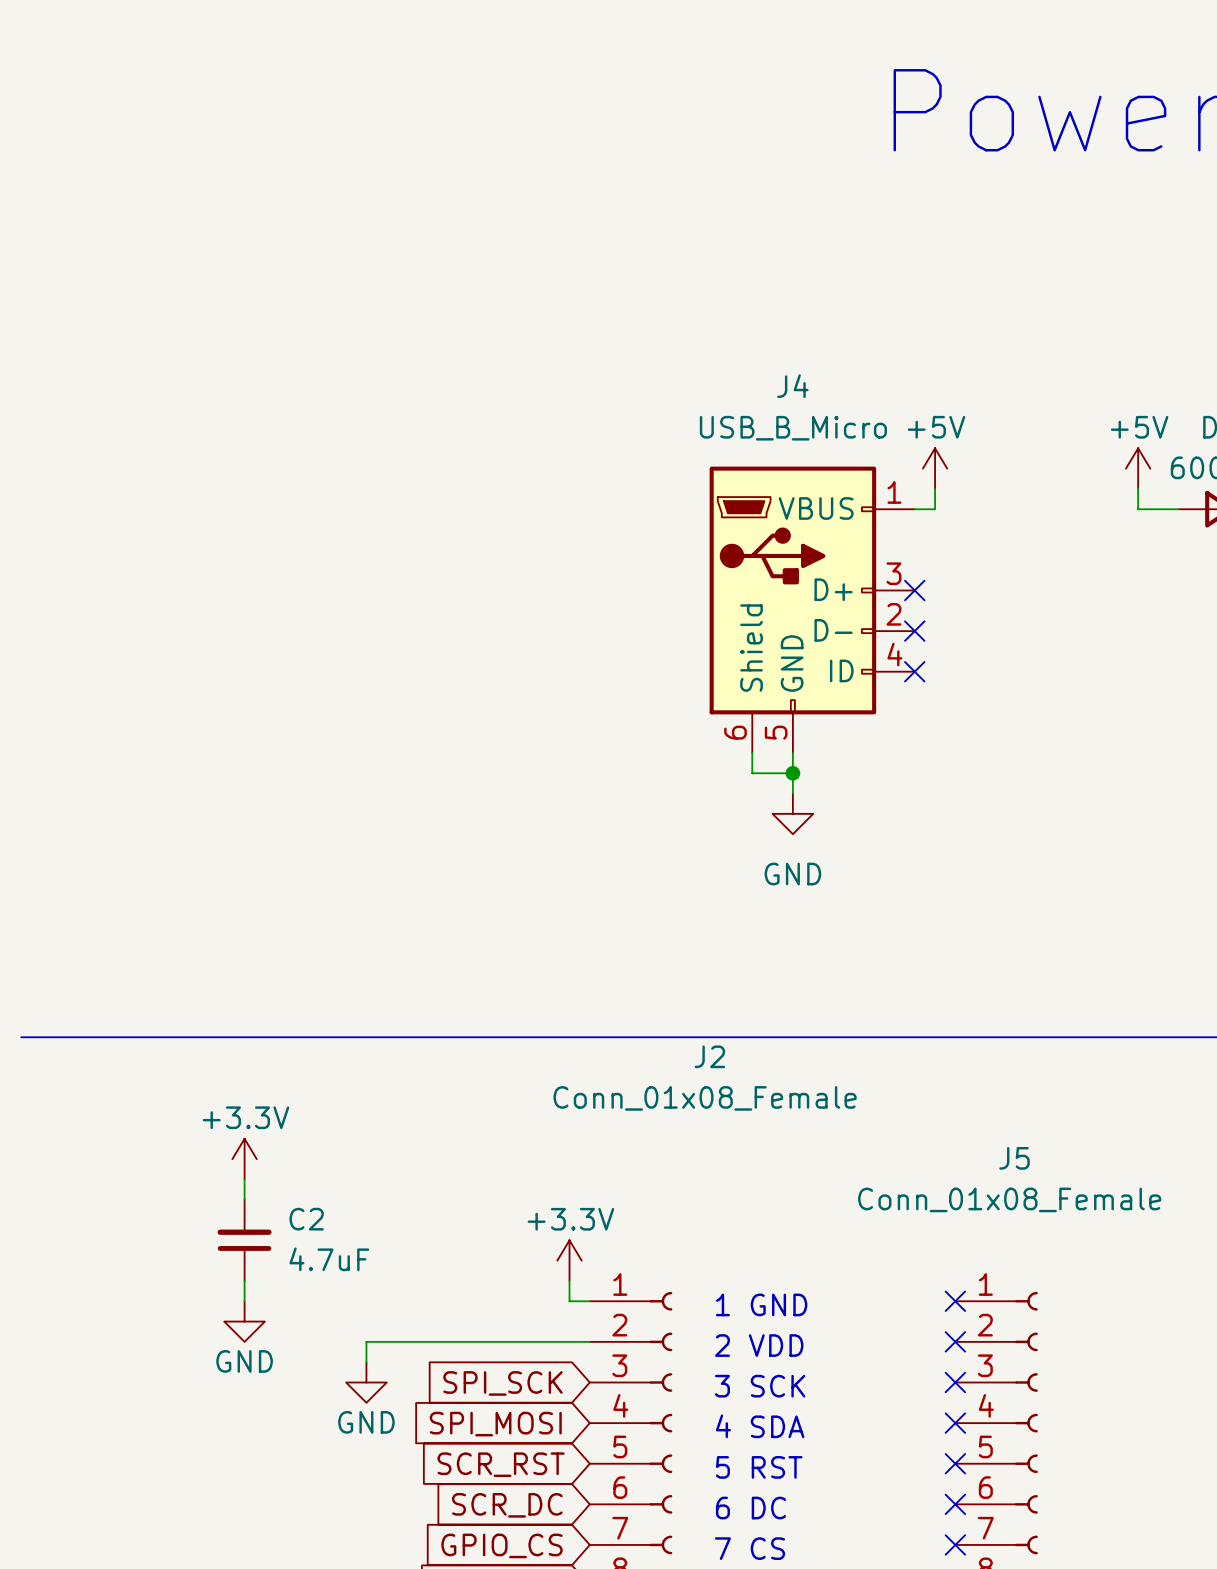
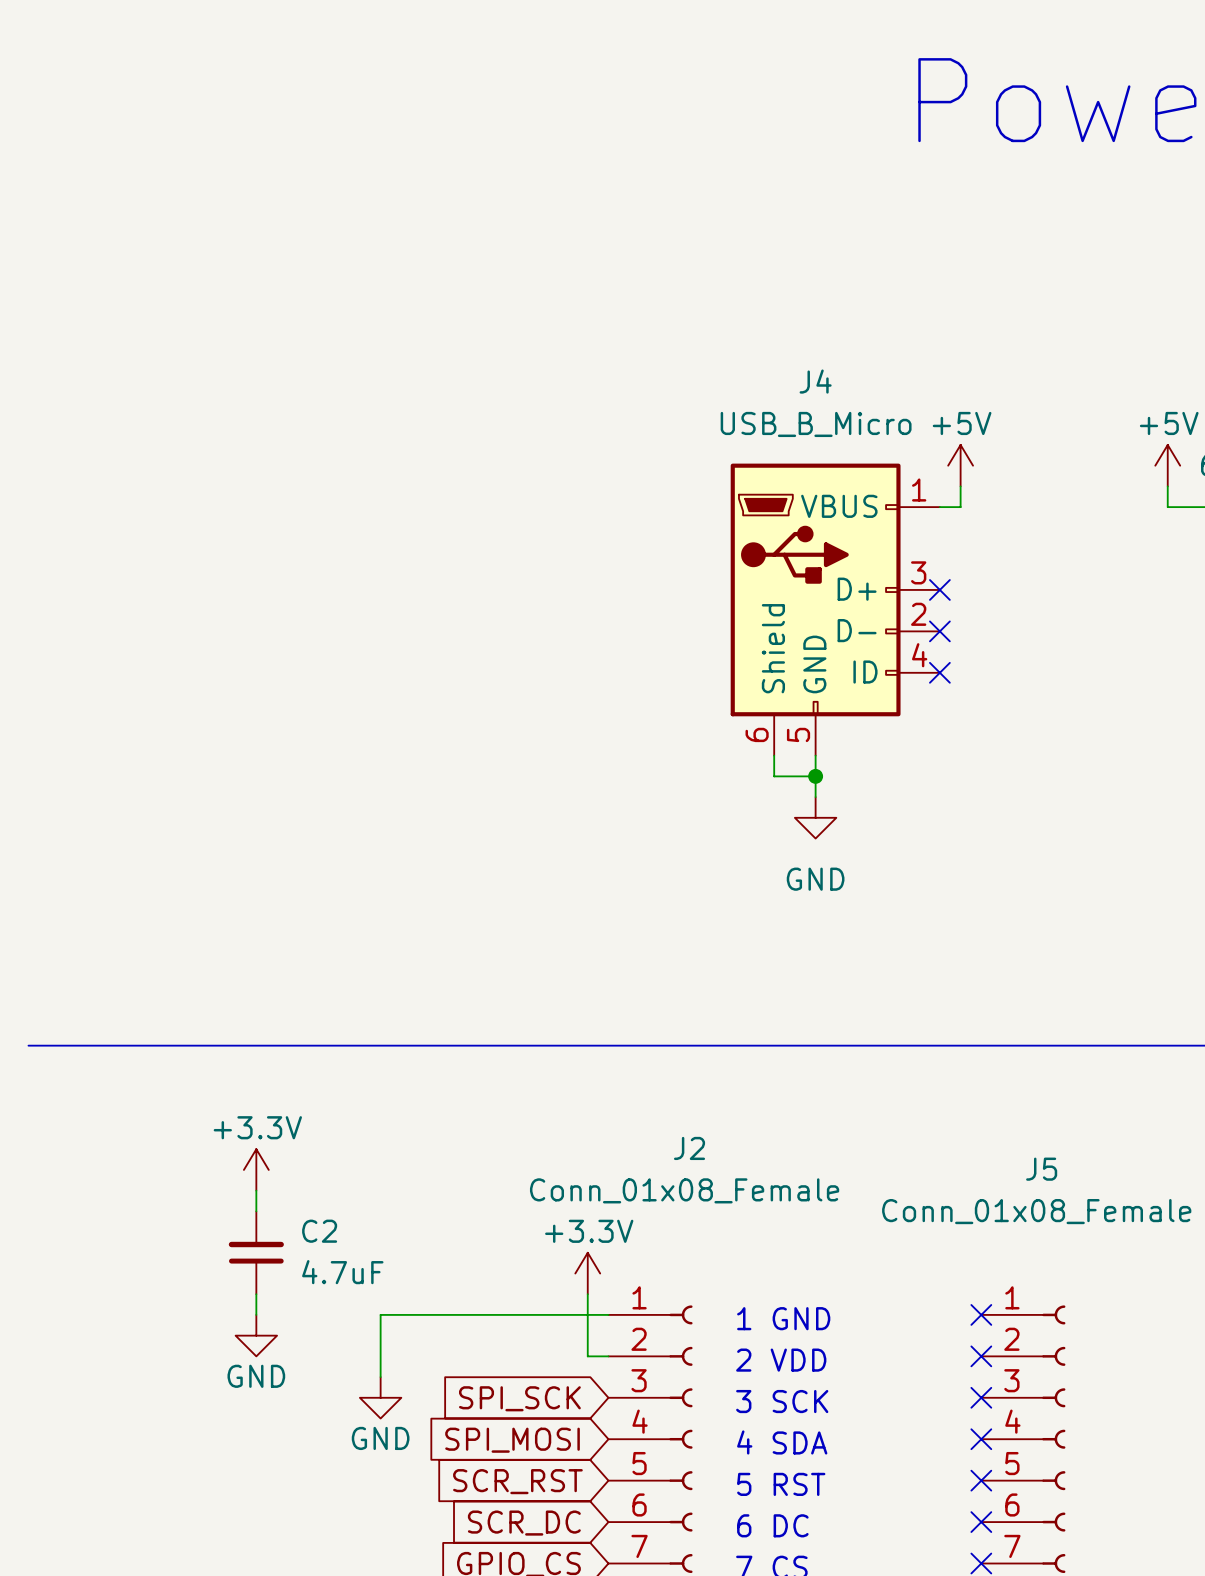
J2 name position: J2 (709, 1056) -> J2 (689, 1148)
J2 value position: Conn_01x08_Female (705, 1098) -> Conn_01x08_Female (684, 1190)
wire: (366, 1341) (569, 1341) -> (380, 1356) (380, 1314) (587, 1314) (587, 1356)

